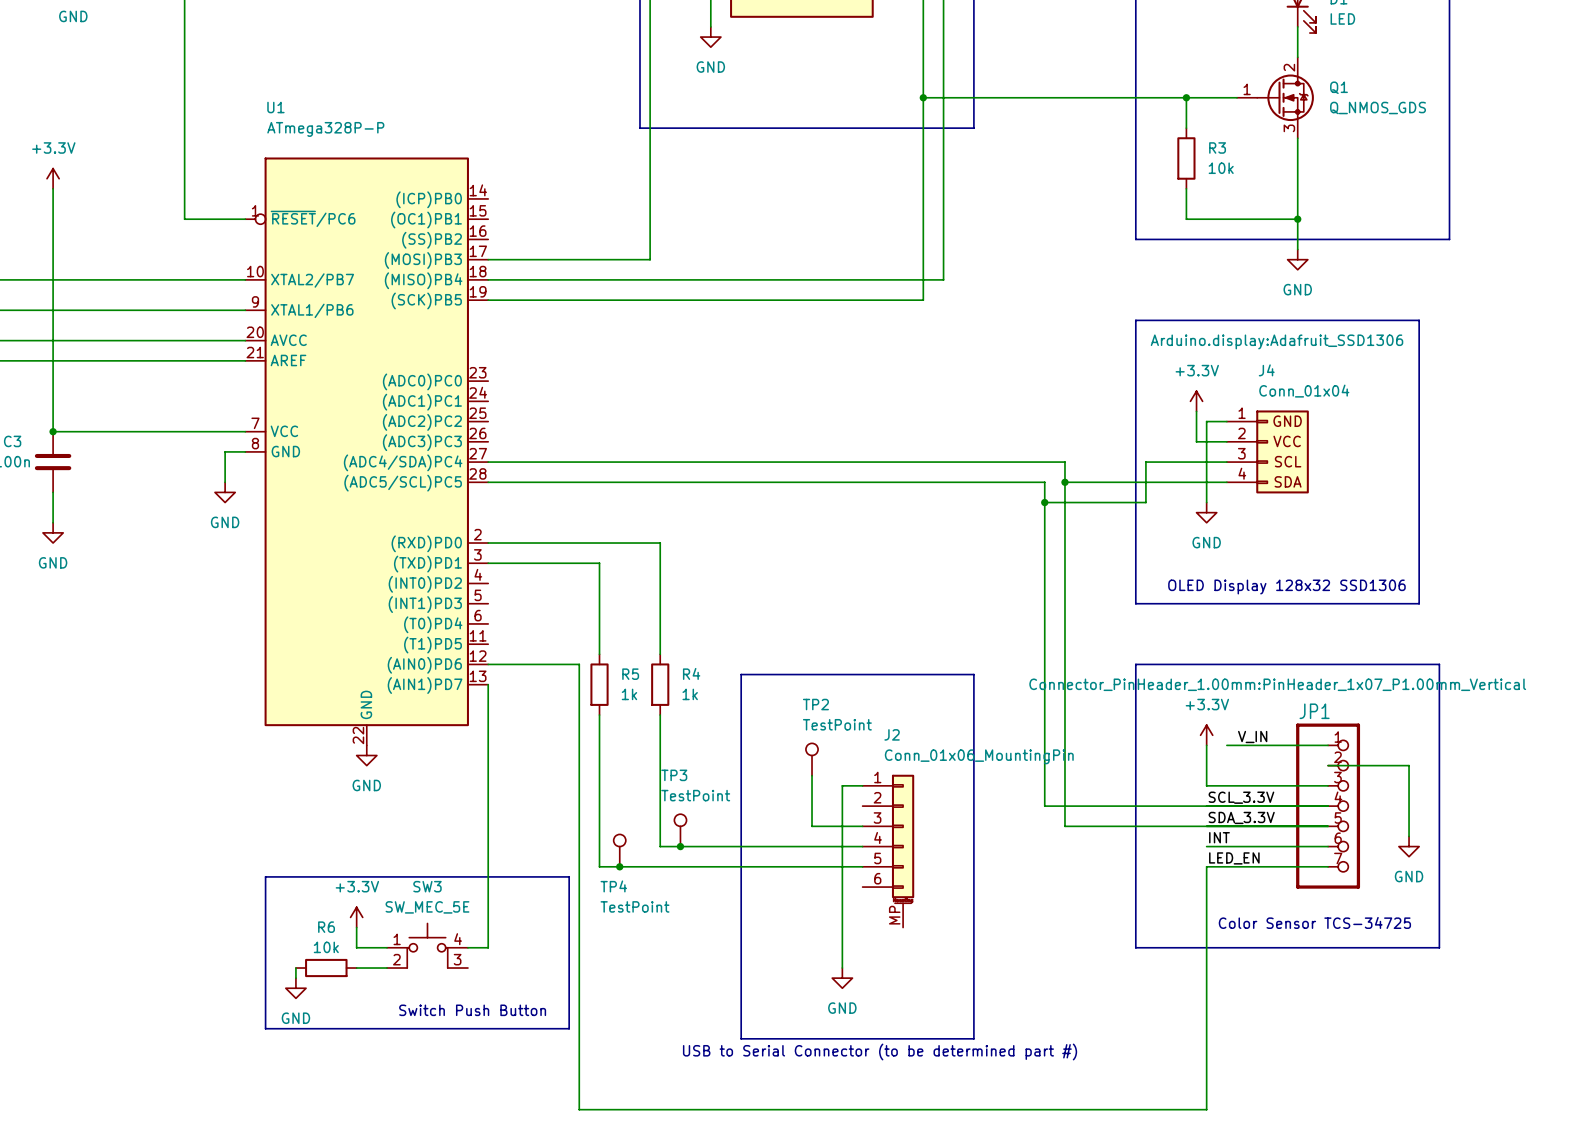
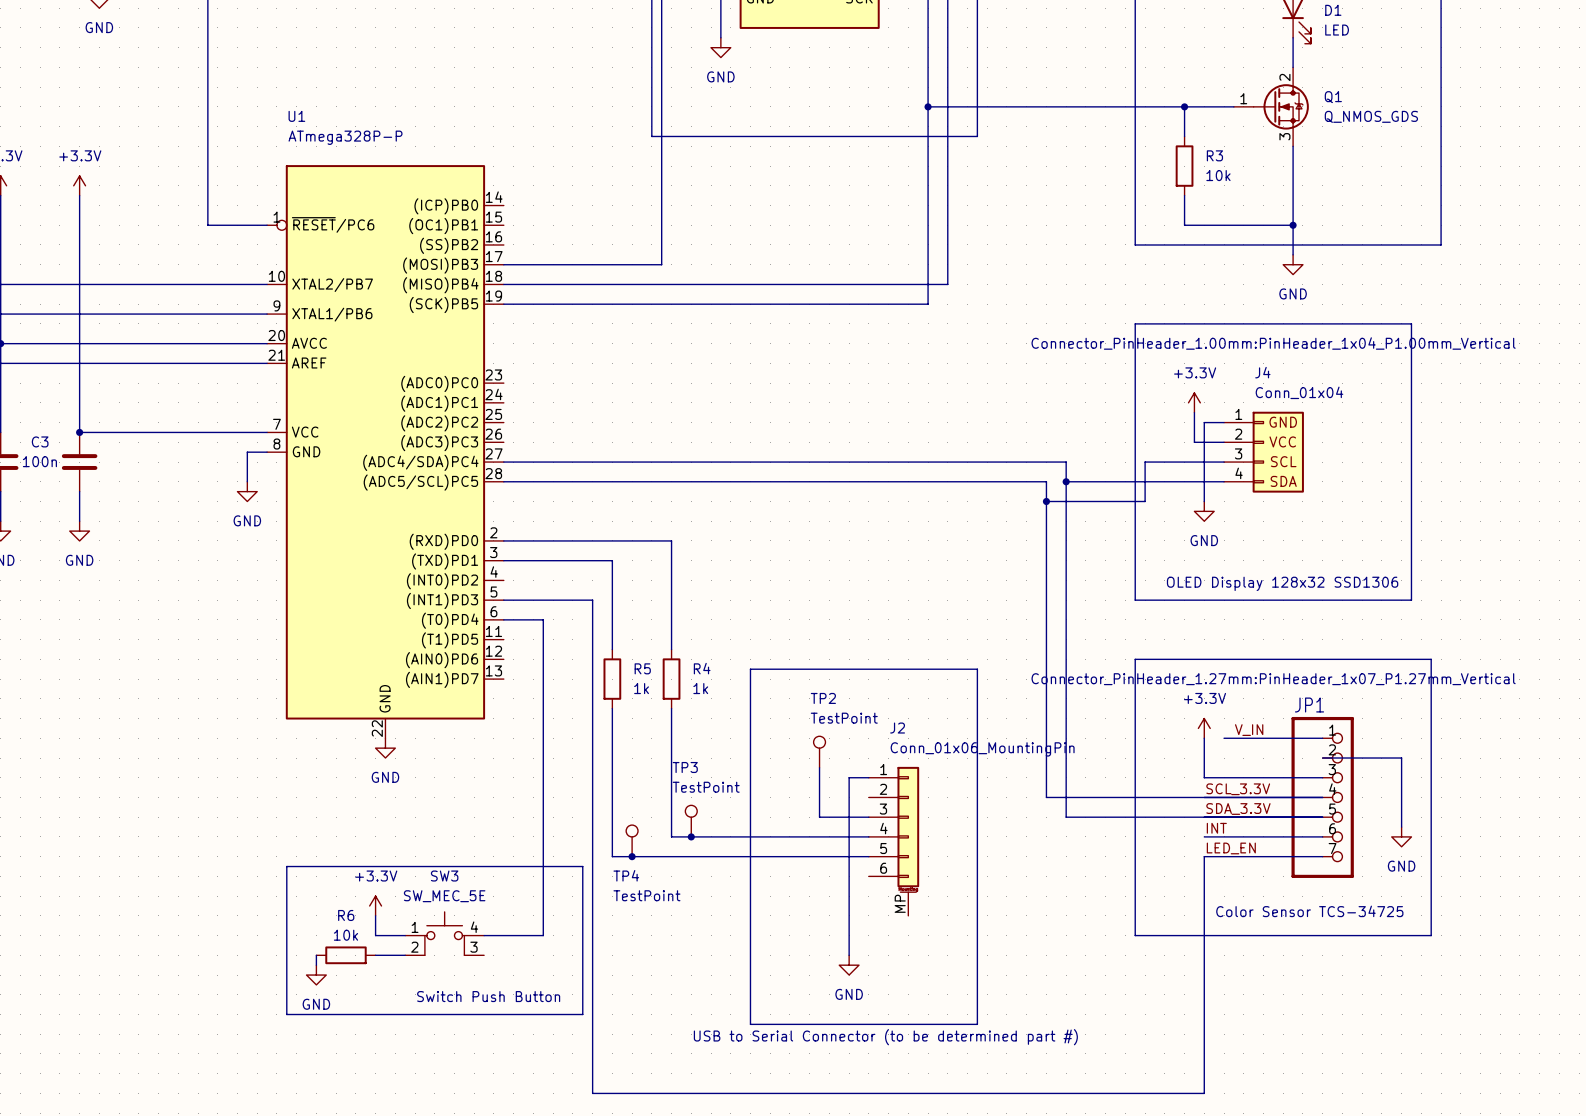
J4 text: Arduino.display:Adafruit_SSD1306 (1277, 341) -> Connector_PinHeader_1.00mm:PinHeader_1x04_P1.00mm_Vertical (1273, 343)
wire: (488, 664) (579, 664) -> (503, 600) (592, 600) (592, 659)
wire: (488, 684) (488, 947) -> (503, 619) (543, 619) (543, 935) (503, 935)
JP1 text: Connector_PinHeader_1.00mm:PinHeader_1x07_P1.00mm_Vertical (1277, 684) -> Connector_PinHeader_1.27mm:PinHeader_1x07_P1.27mm_Vertical (1273, 679)

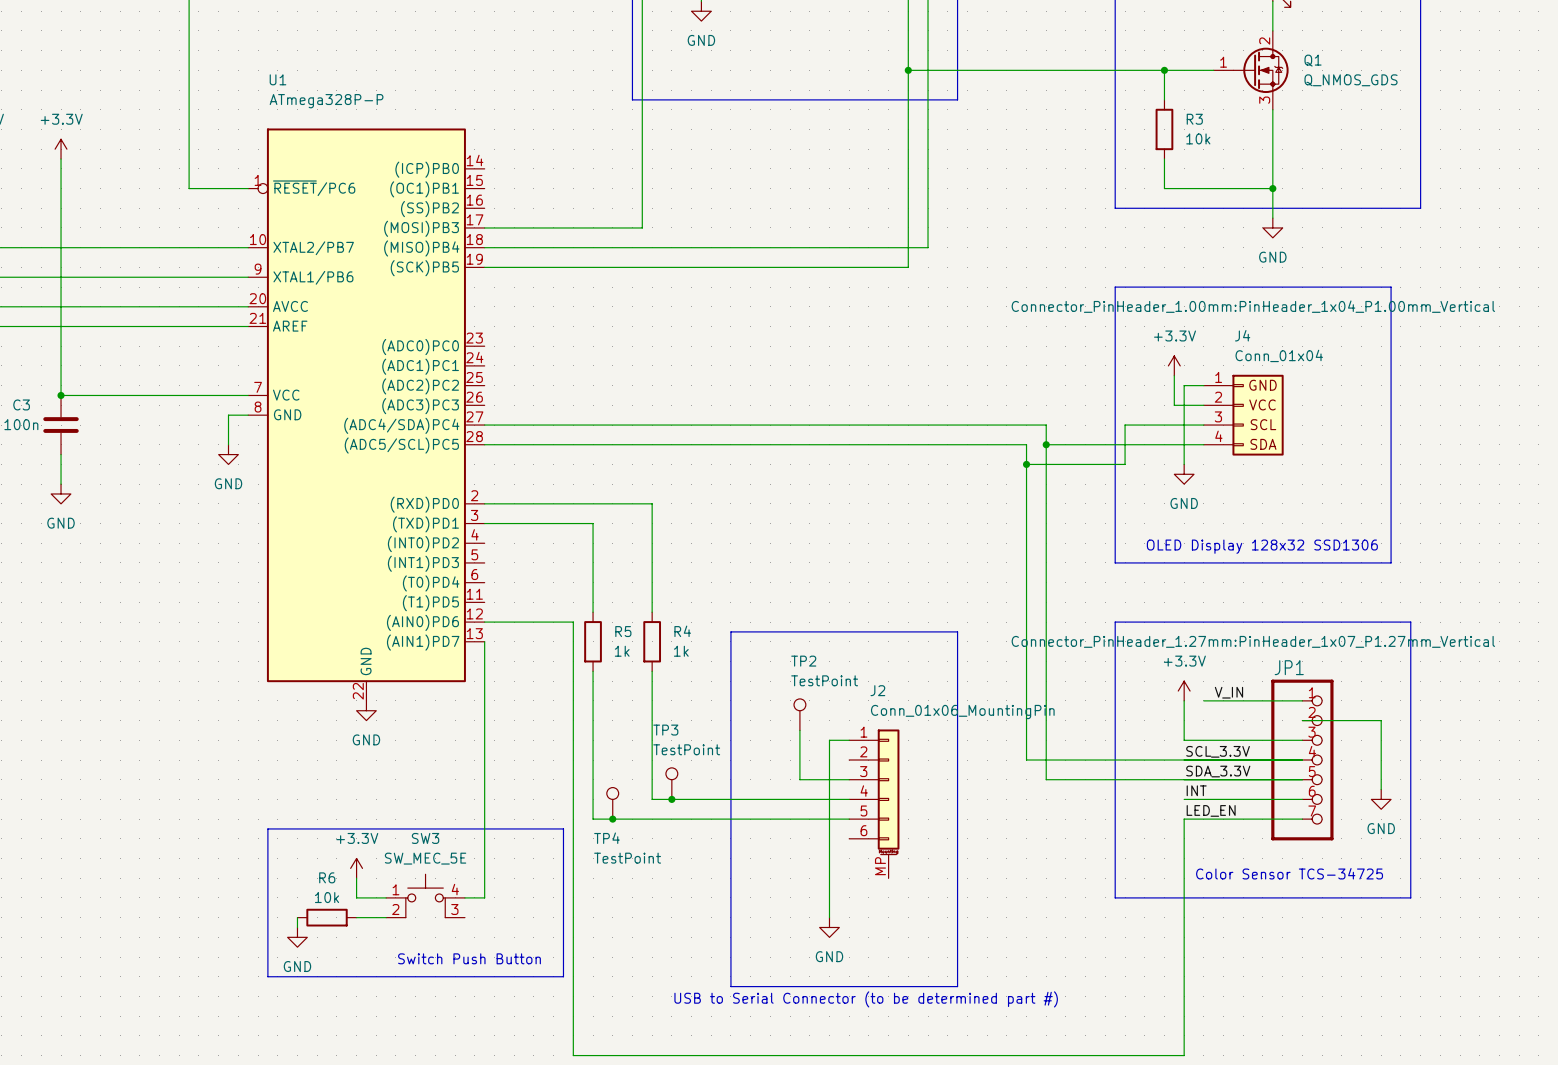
wire: (503, 600) (592, 600) (592, 659) -> (484, 622) (573, 622)
wire: (503, 619) (543, 619) (543, 935) (503, 935) -> (484, 641) (484, 897)

